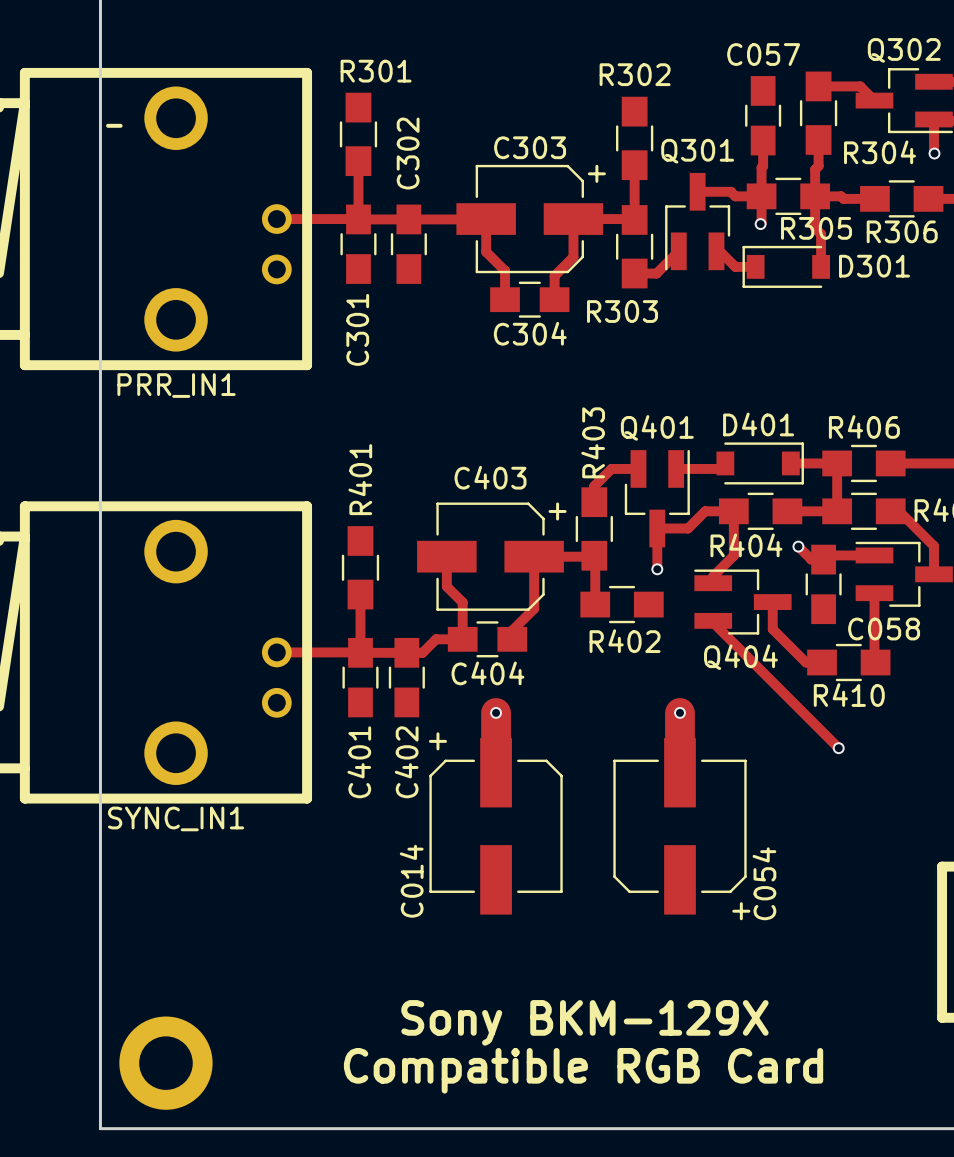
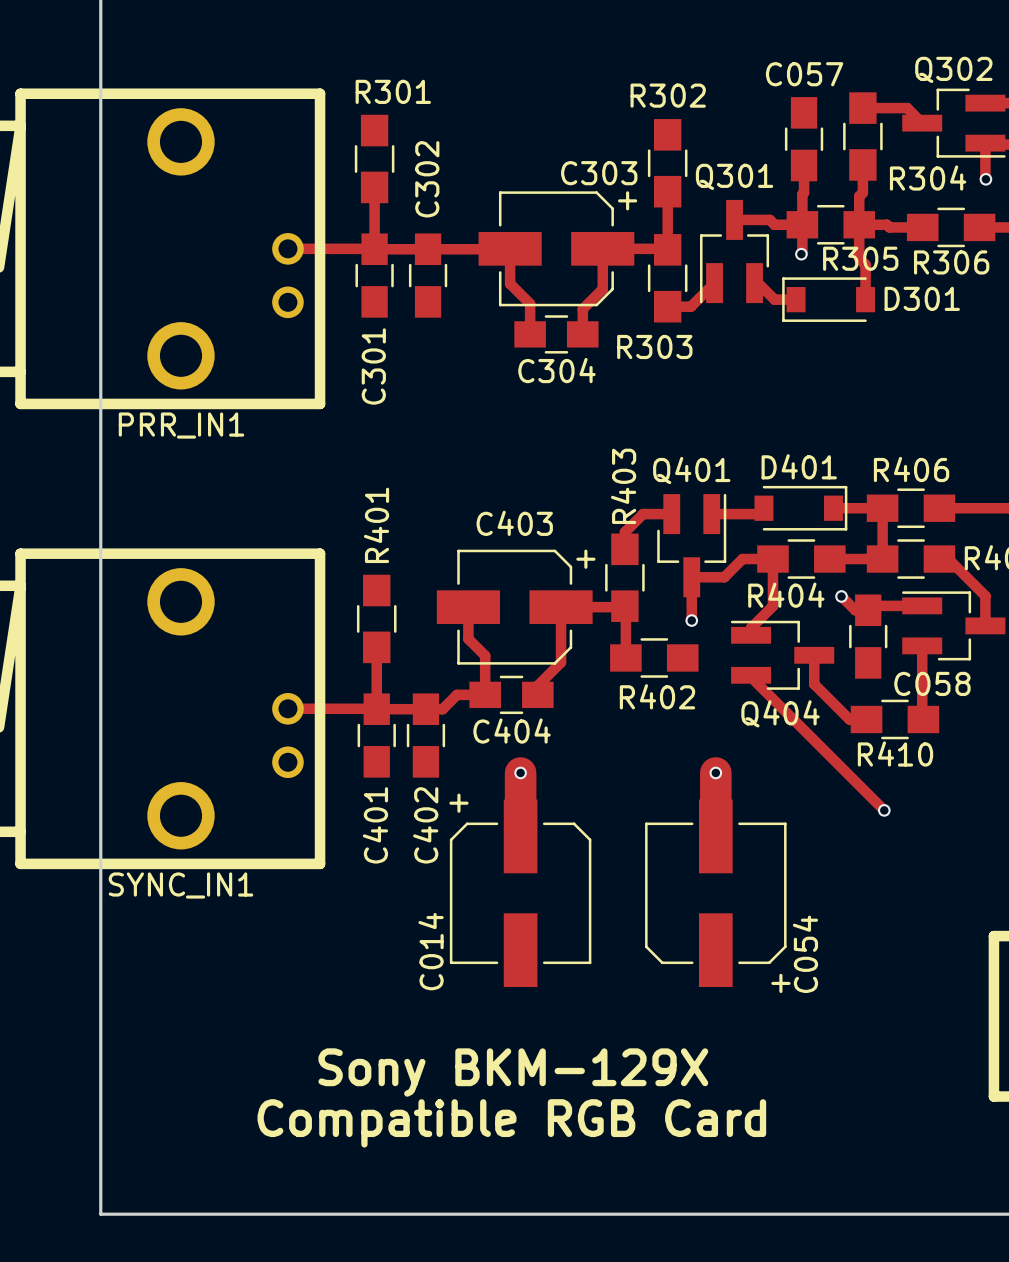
line: (108, 125) (120, 125) -> none
C303 name position: C303 (530, 147) -> C303 (599, 173)
text position: Sony BKM-129X (584, 1022) -> Sony BKM-129X (513, 1072)
part: (165, 1063) -> none
text position: Compatible RGB Card (583, 1070) -> Compatible RGB Card (511, 1123)

